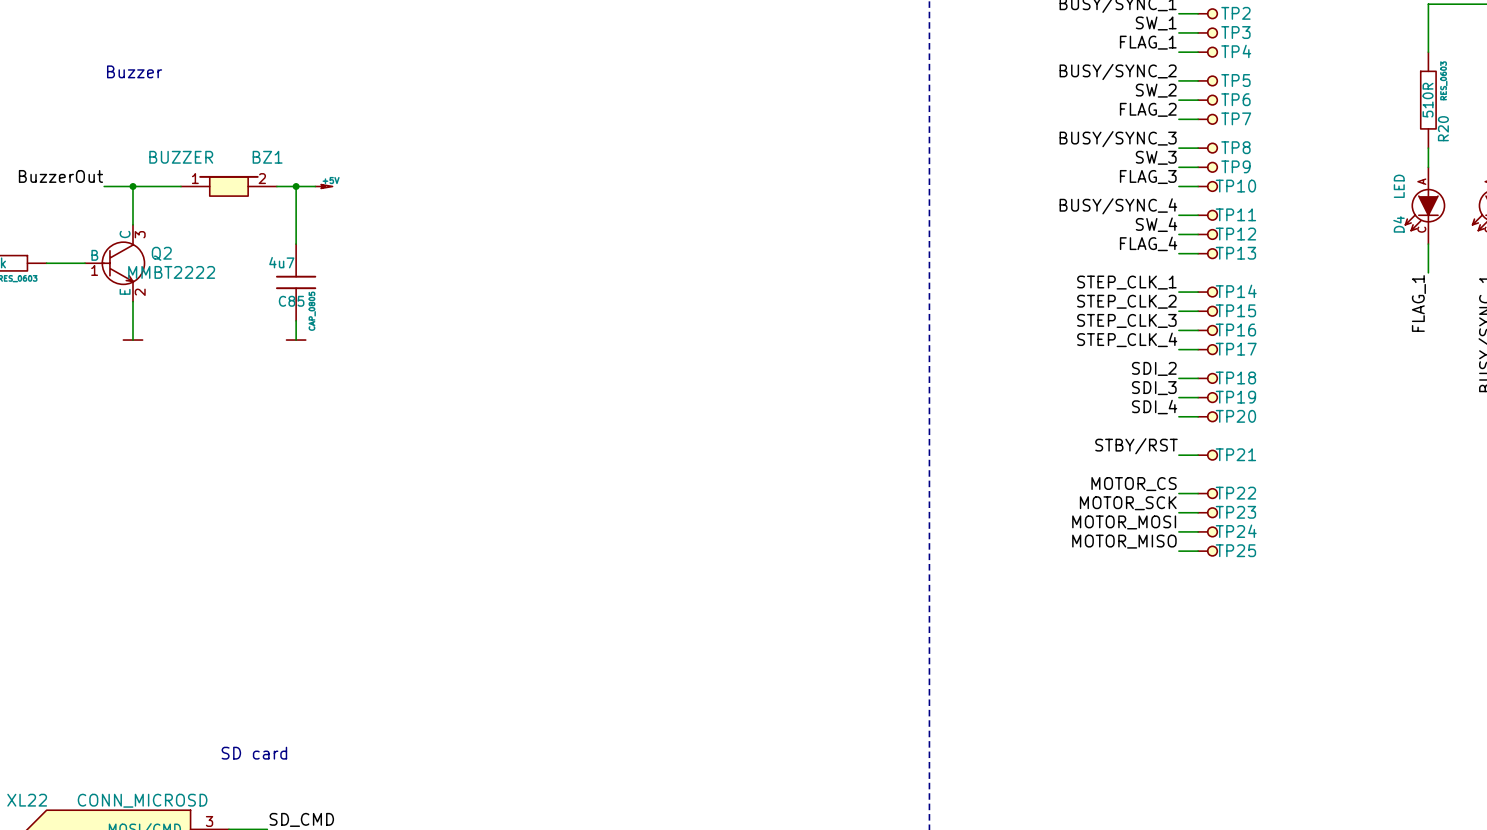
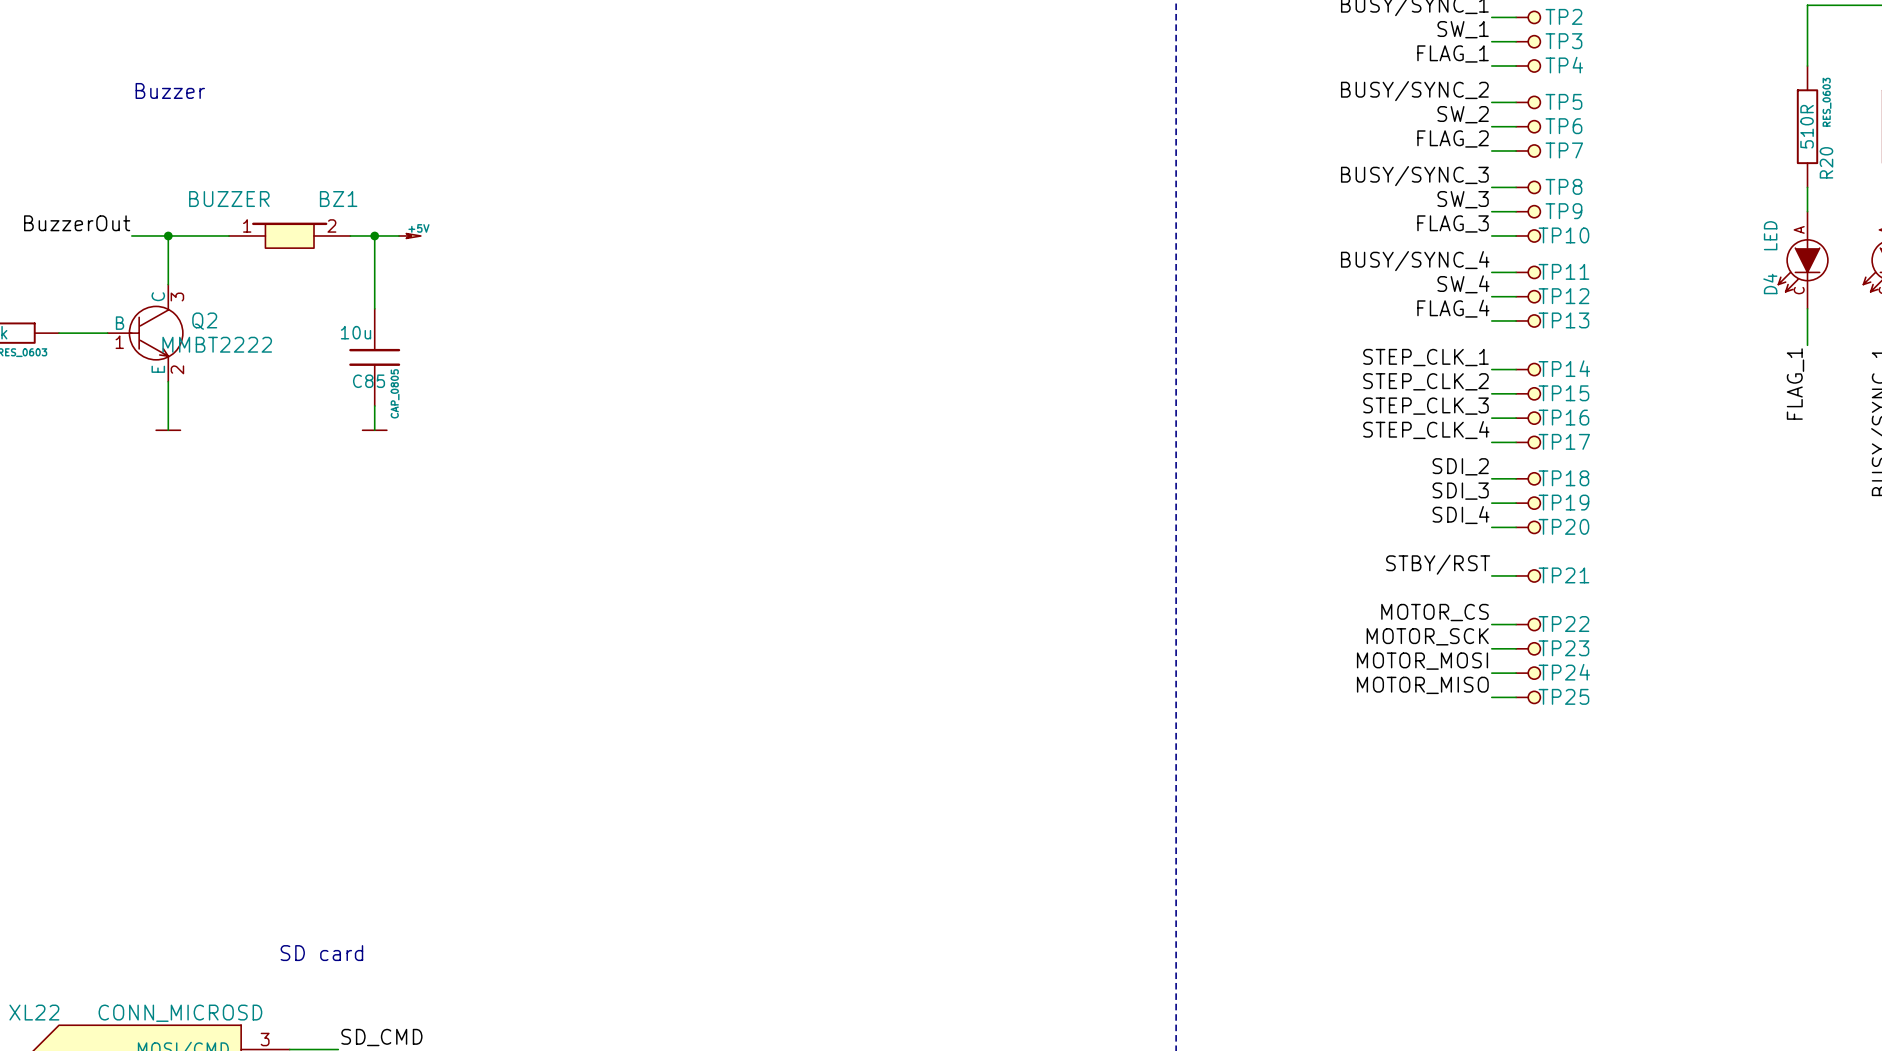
C85 value: 4u7 (281, 262) -> 10u (356, 332)

